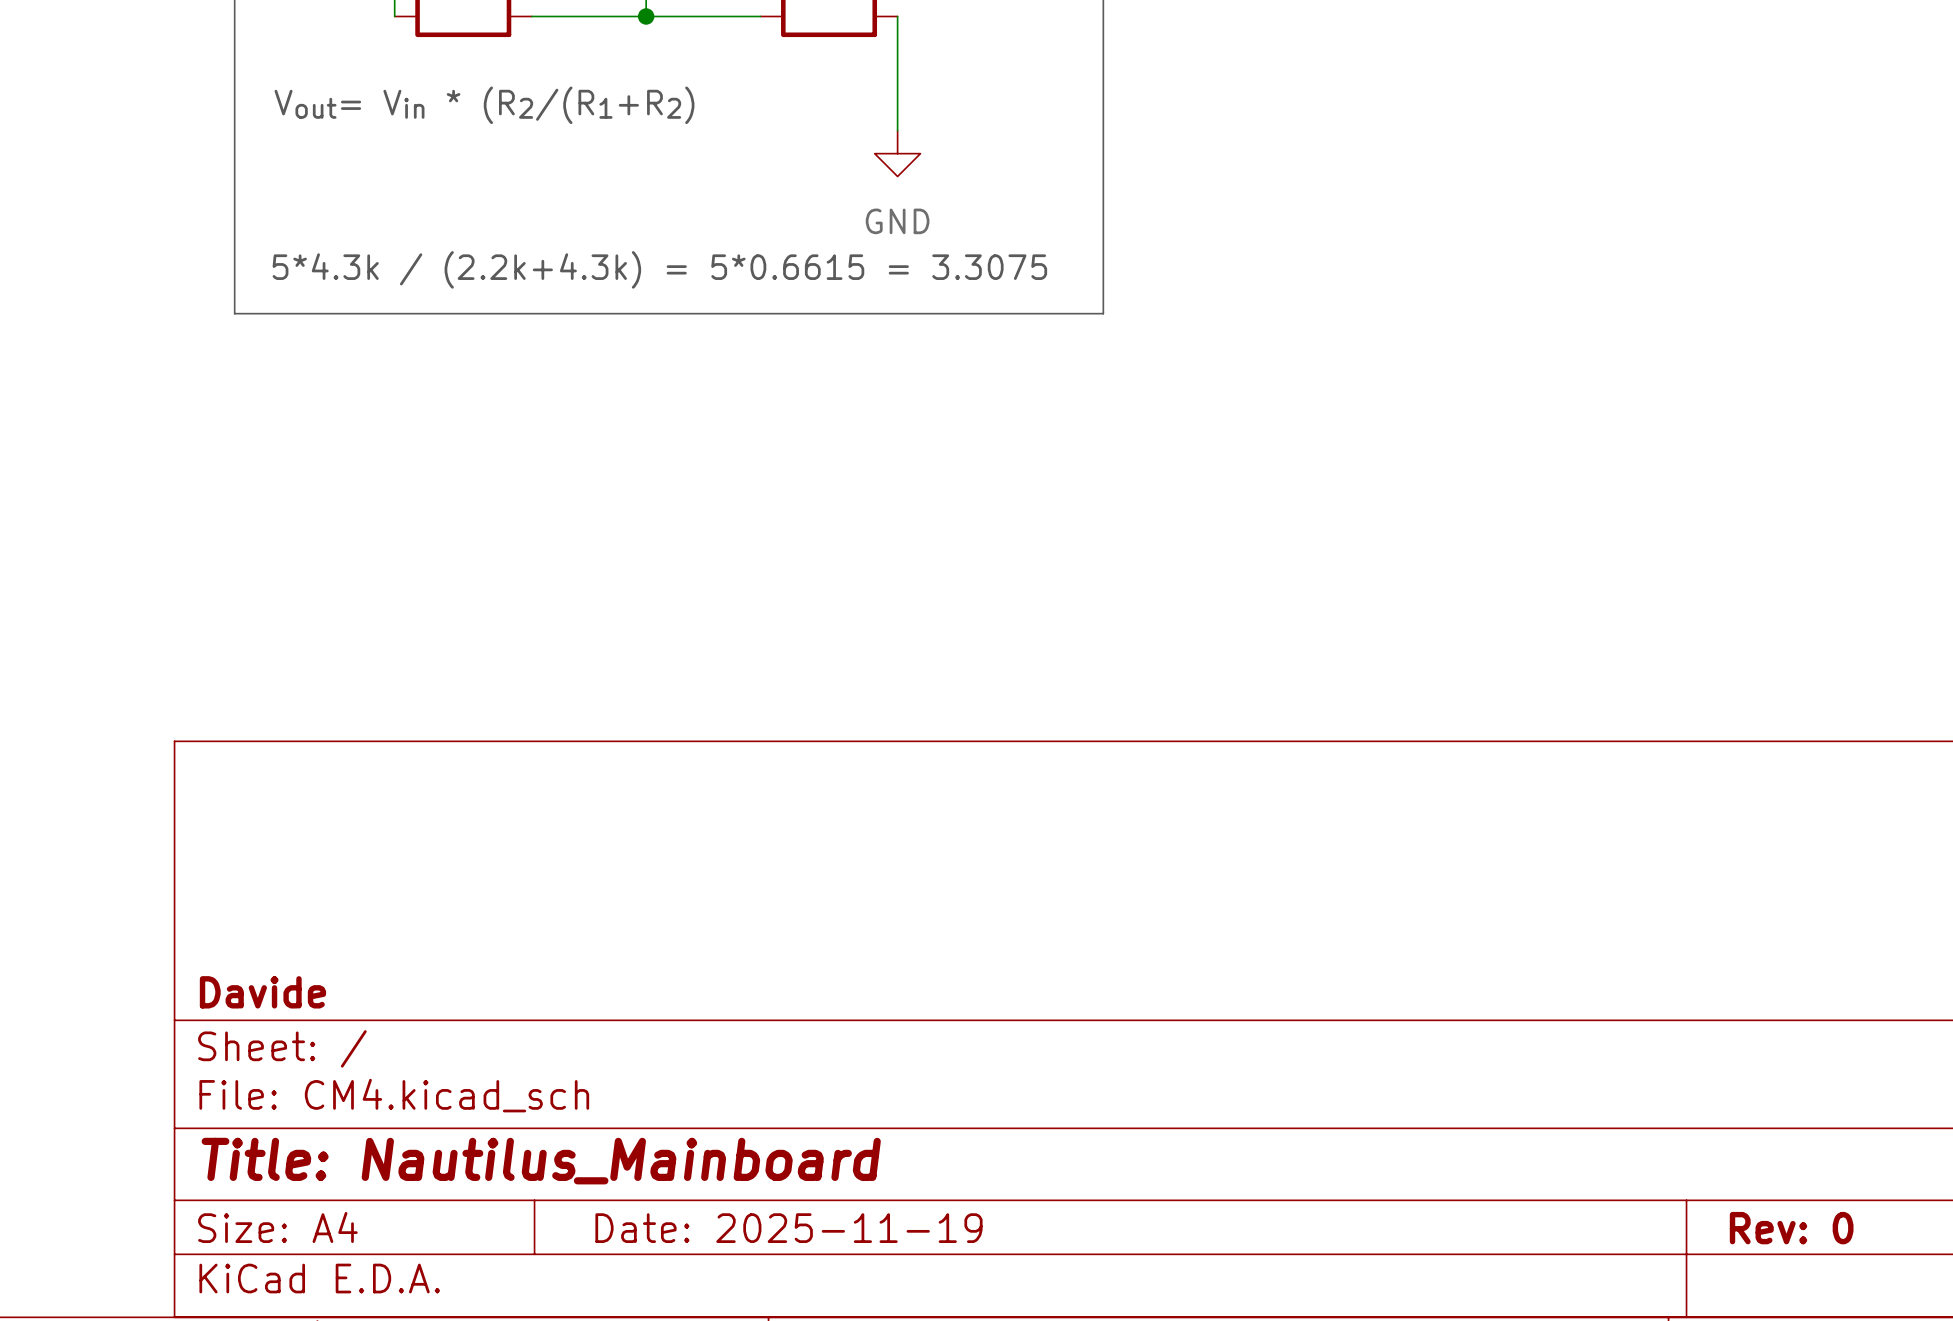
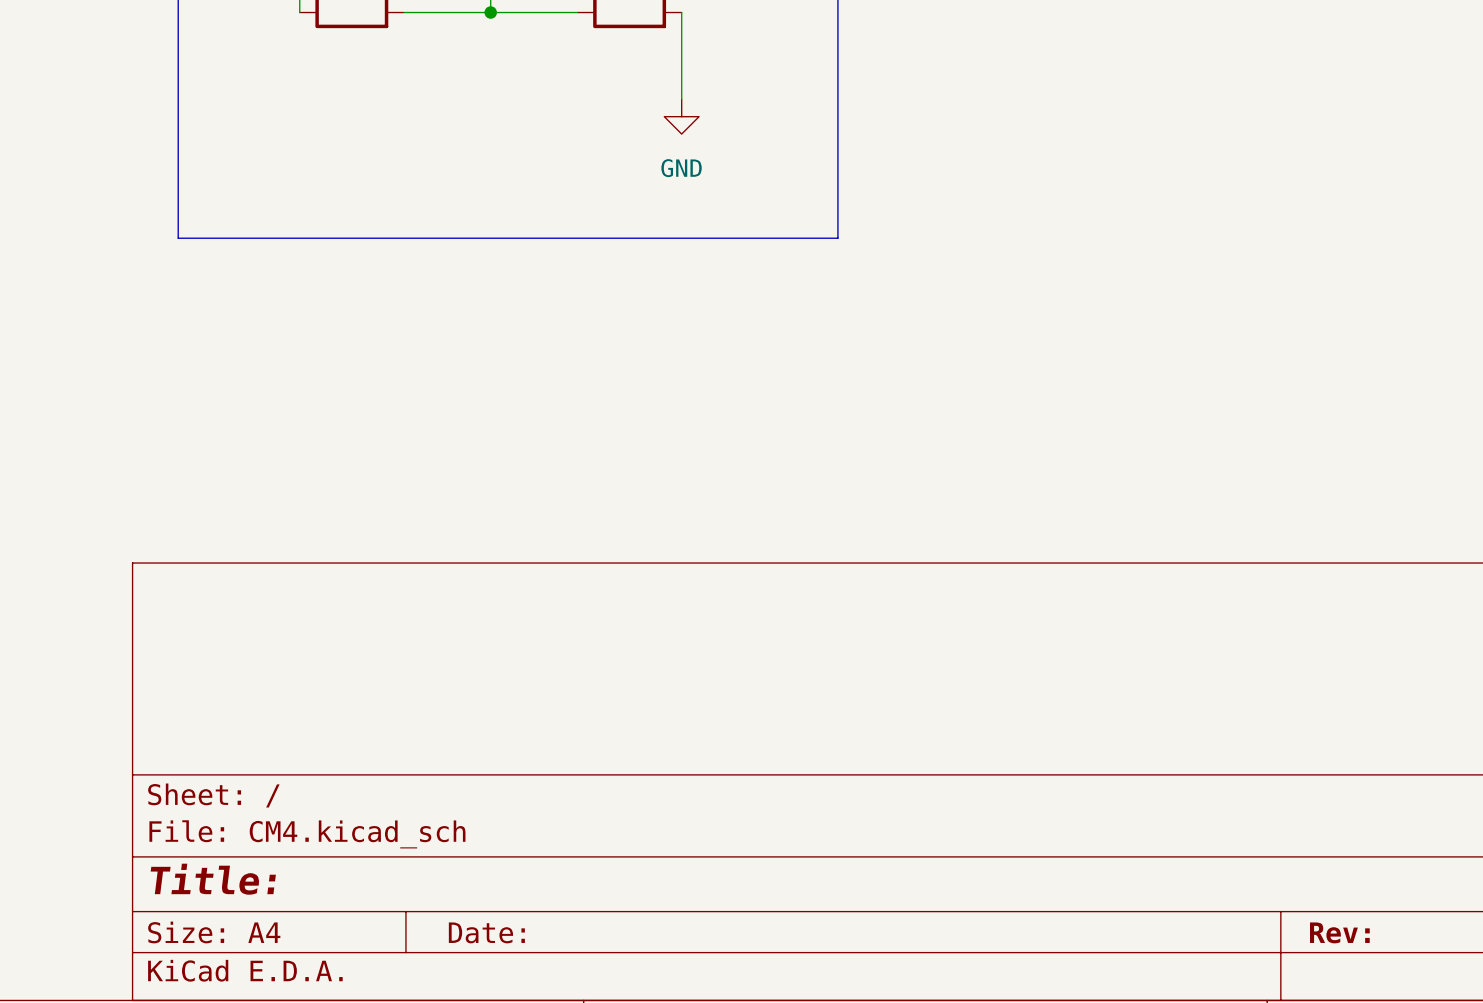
text: Vout= Vin * (R2/(R1+R2) (484, 105) -> none
text: 5*4.3k / (2.2k+4.3k) = 5*0.6615 = 3.3075 (659, 269) -> none
title block: Davide (262, 992) -> none
title block: Title: Nautilus_Mainboard (541, 1161) -> Title: (213, 879)
title block: Date: 2025-11-19 (788, 1228) -> Date: (486, 932)
title block: Rev: 0 (1791, 1228) -> Rev: (1339, 932)

